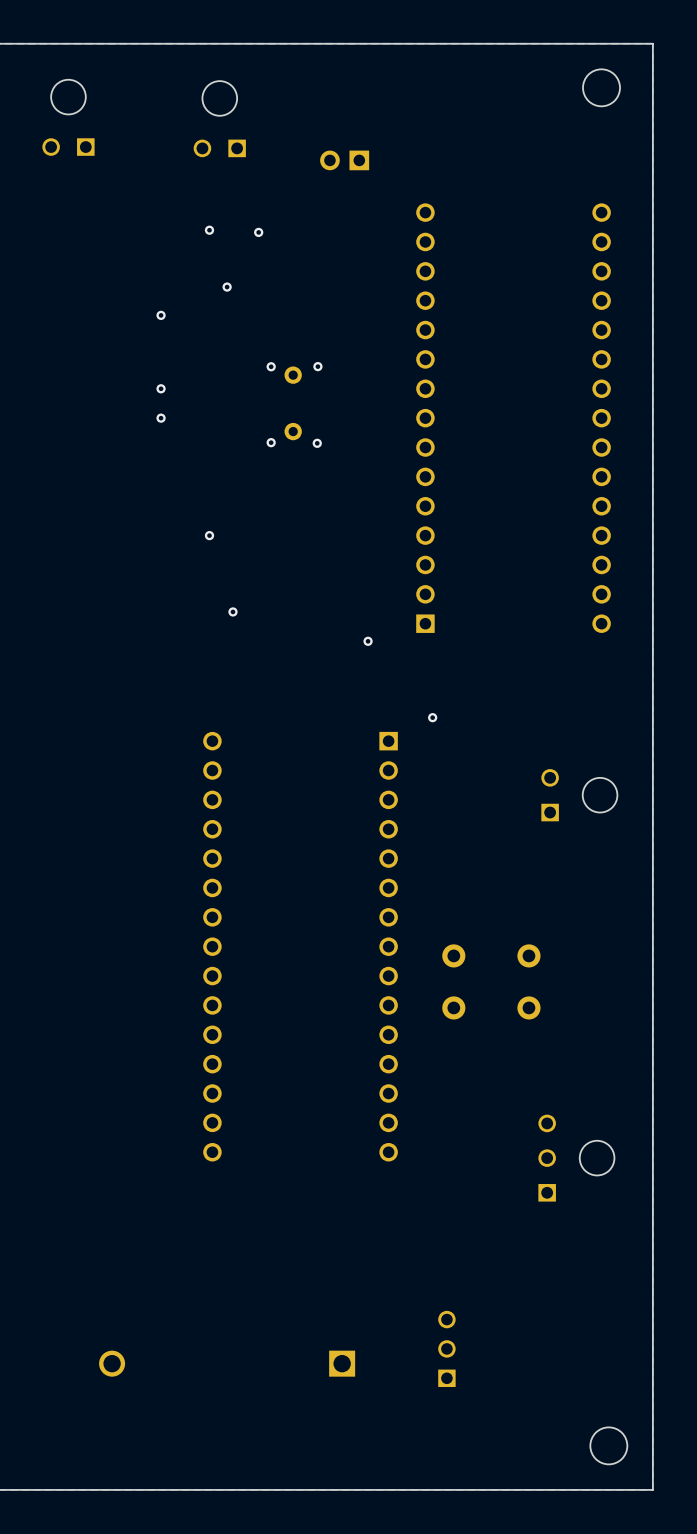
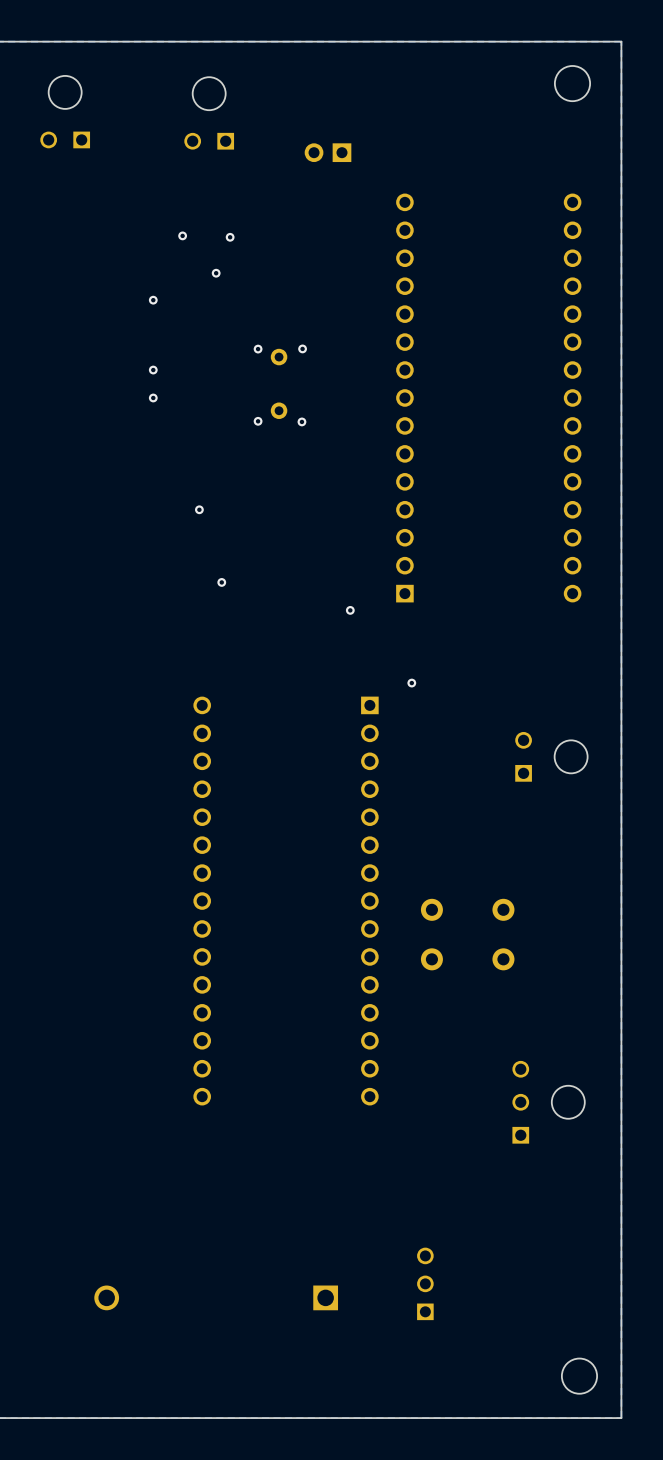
via: (209, 230) -> none
via: (258, 232) -> none
via: none -> (182, 235)
via: none -> (230, 237)

